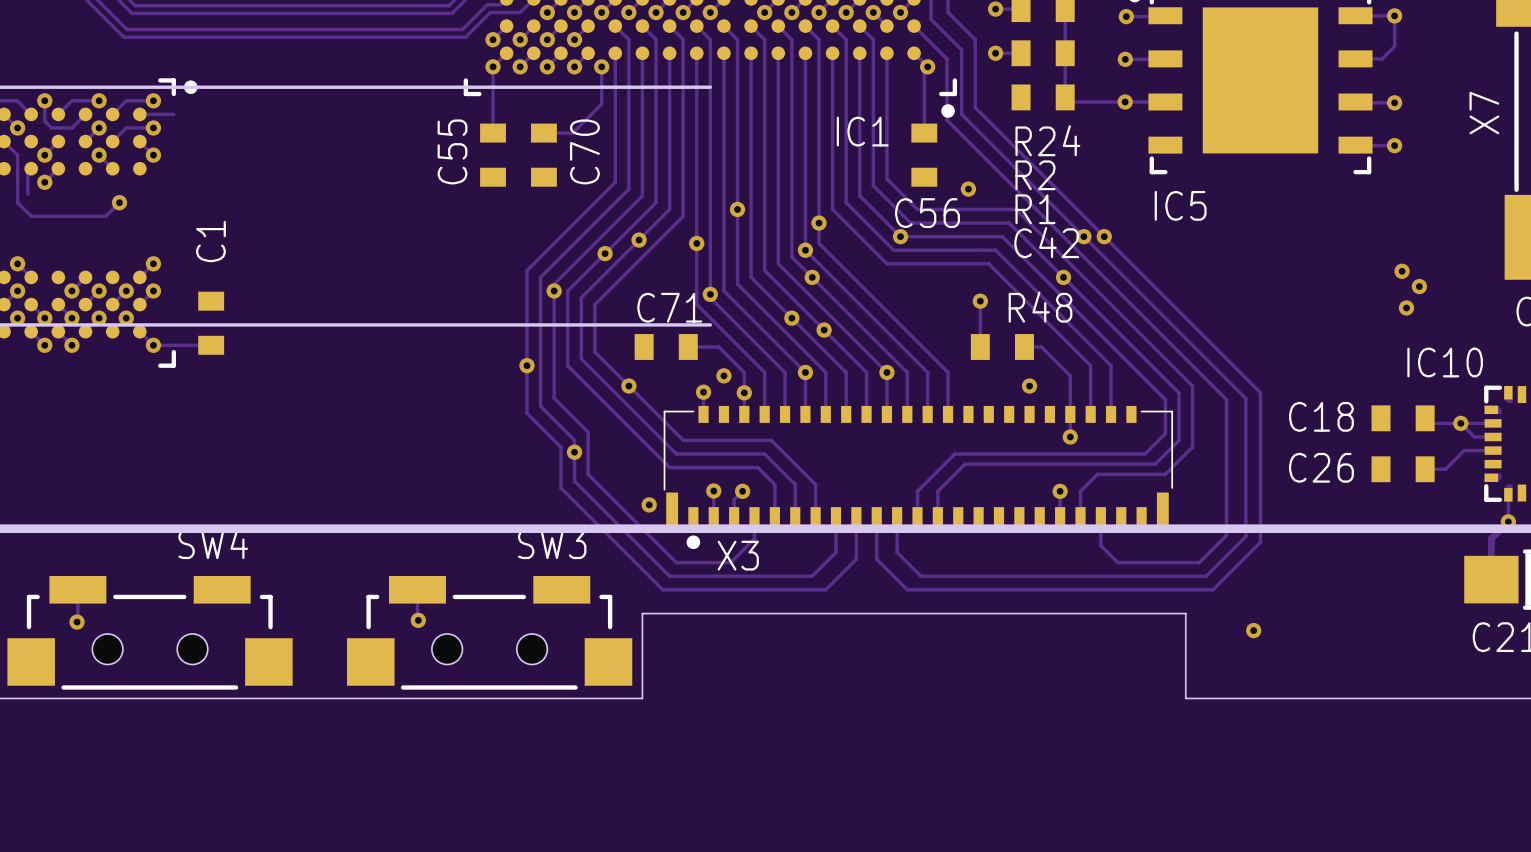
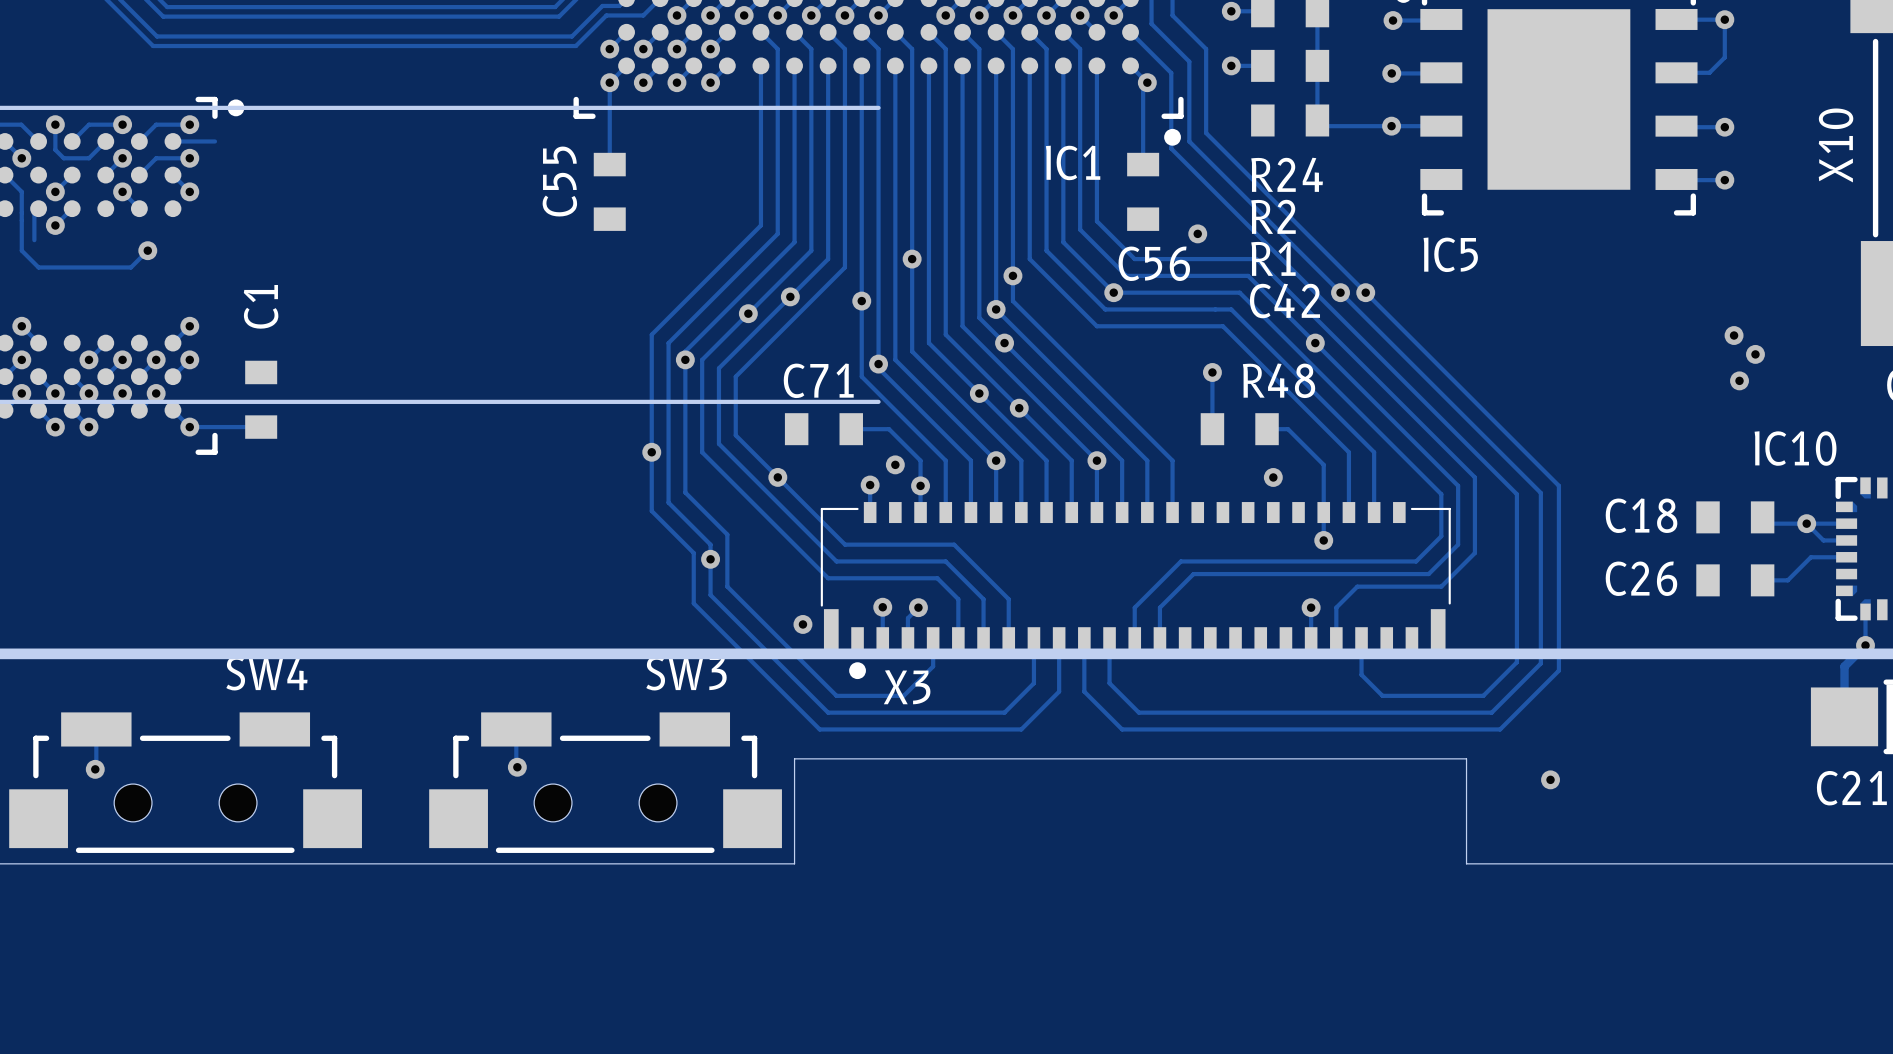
track: (601, 66) (601, 104) (572, 133) (543, 133) -> none
via: (601, 66) -> none
X7 name: X7 (1484, 113) -> X10 (1836, 145)
C70: (543, 155) -> none

